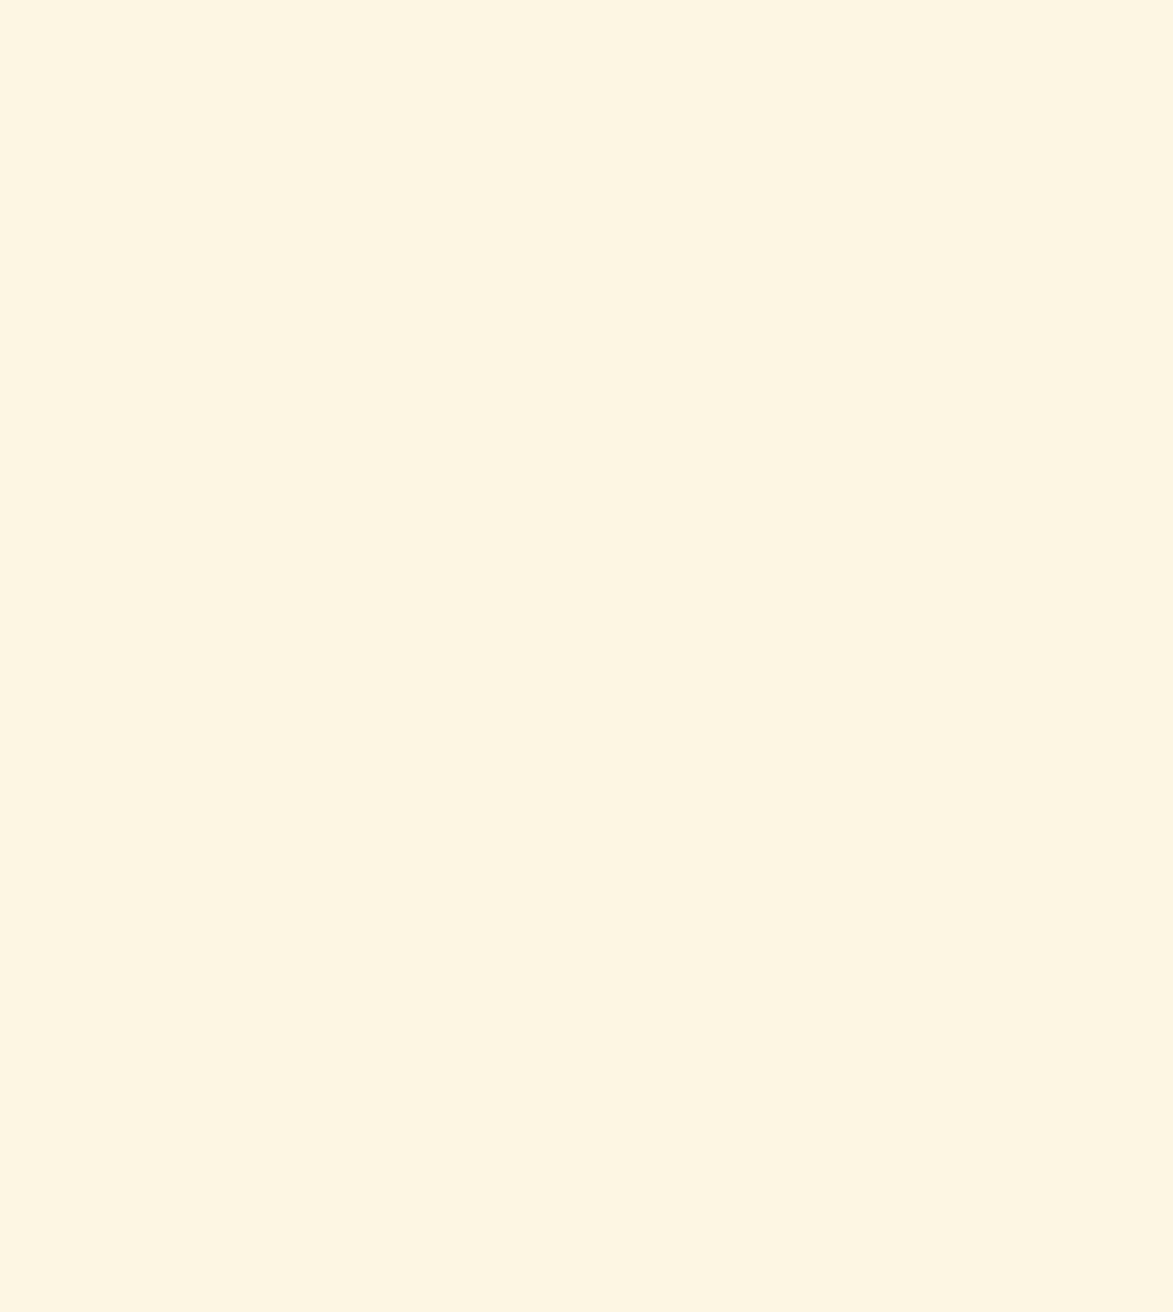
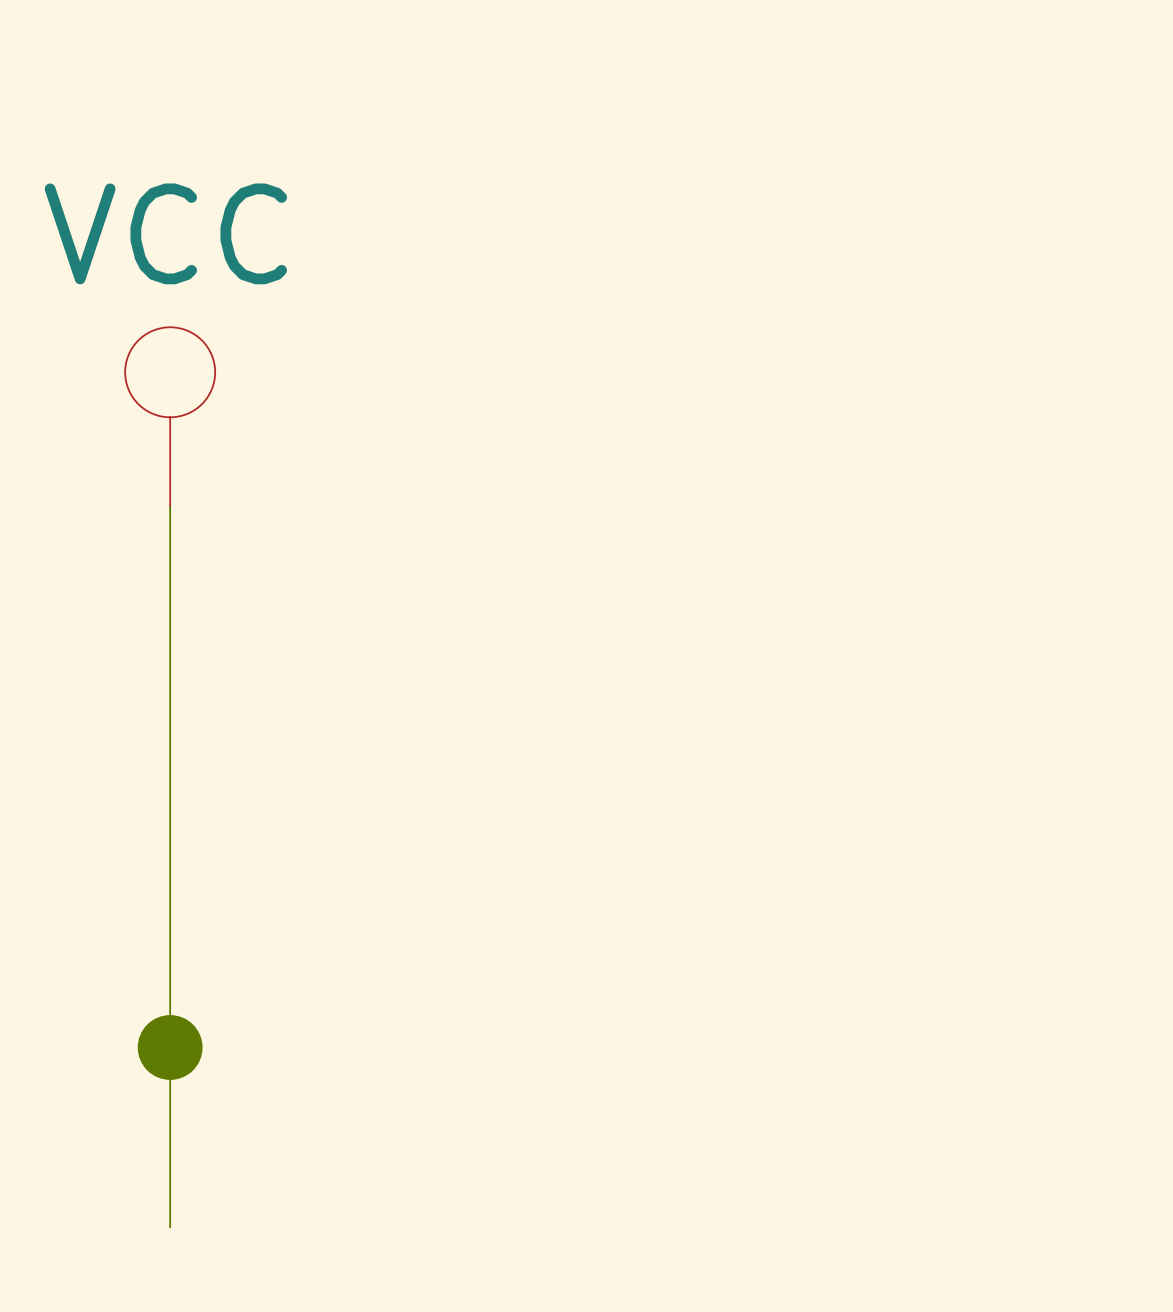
power symbol: none -> VCC (170, 417)
wire: none -> (170, 507) (170, 1227)
junction: none -> (170, 1047)

